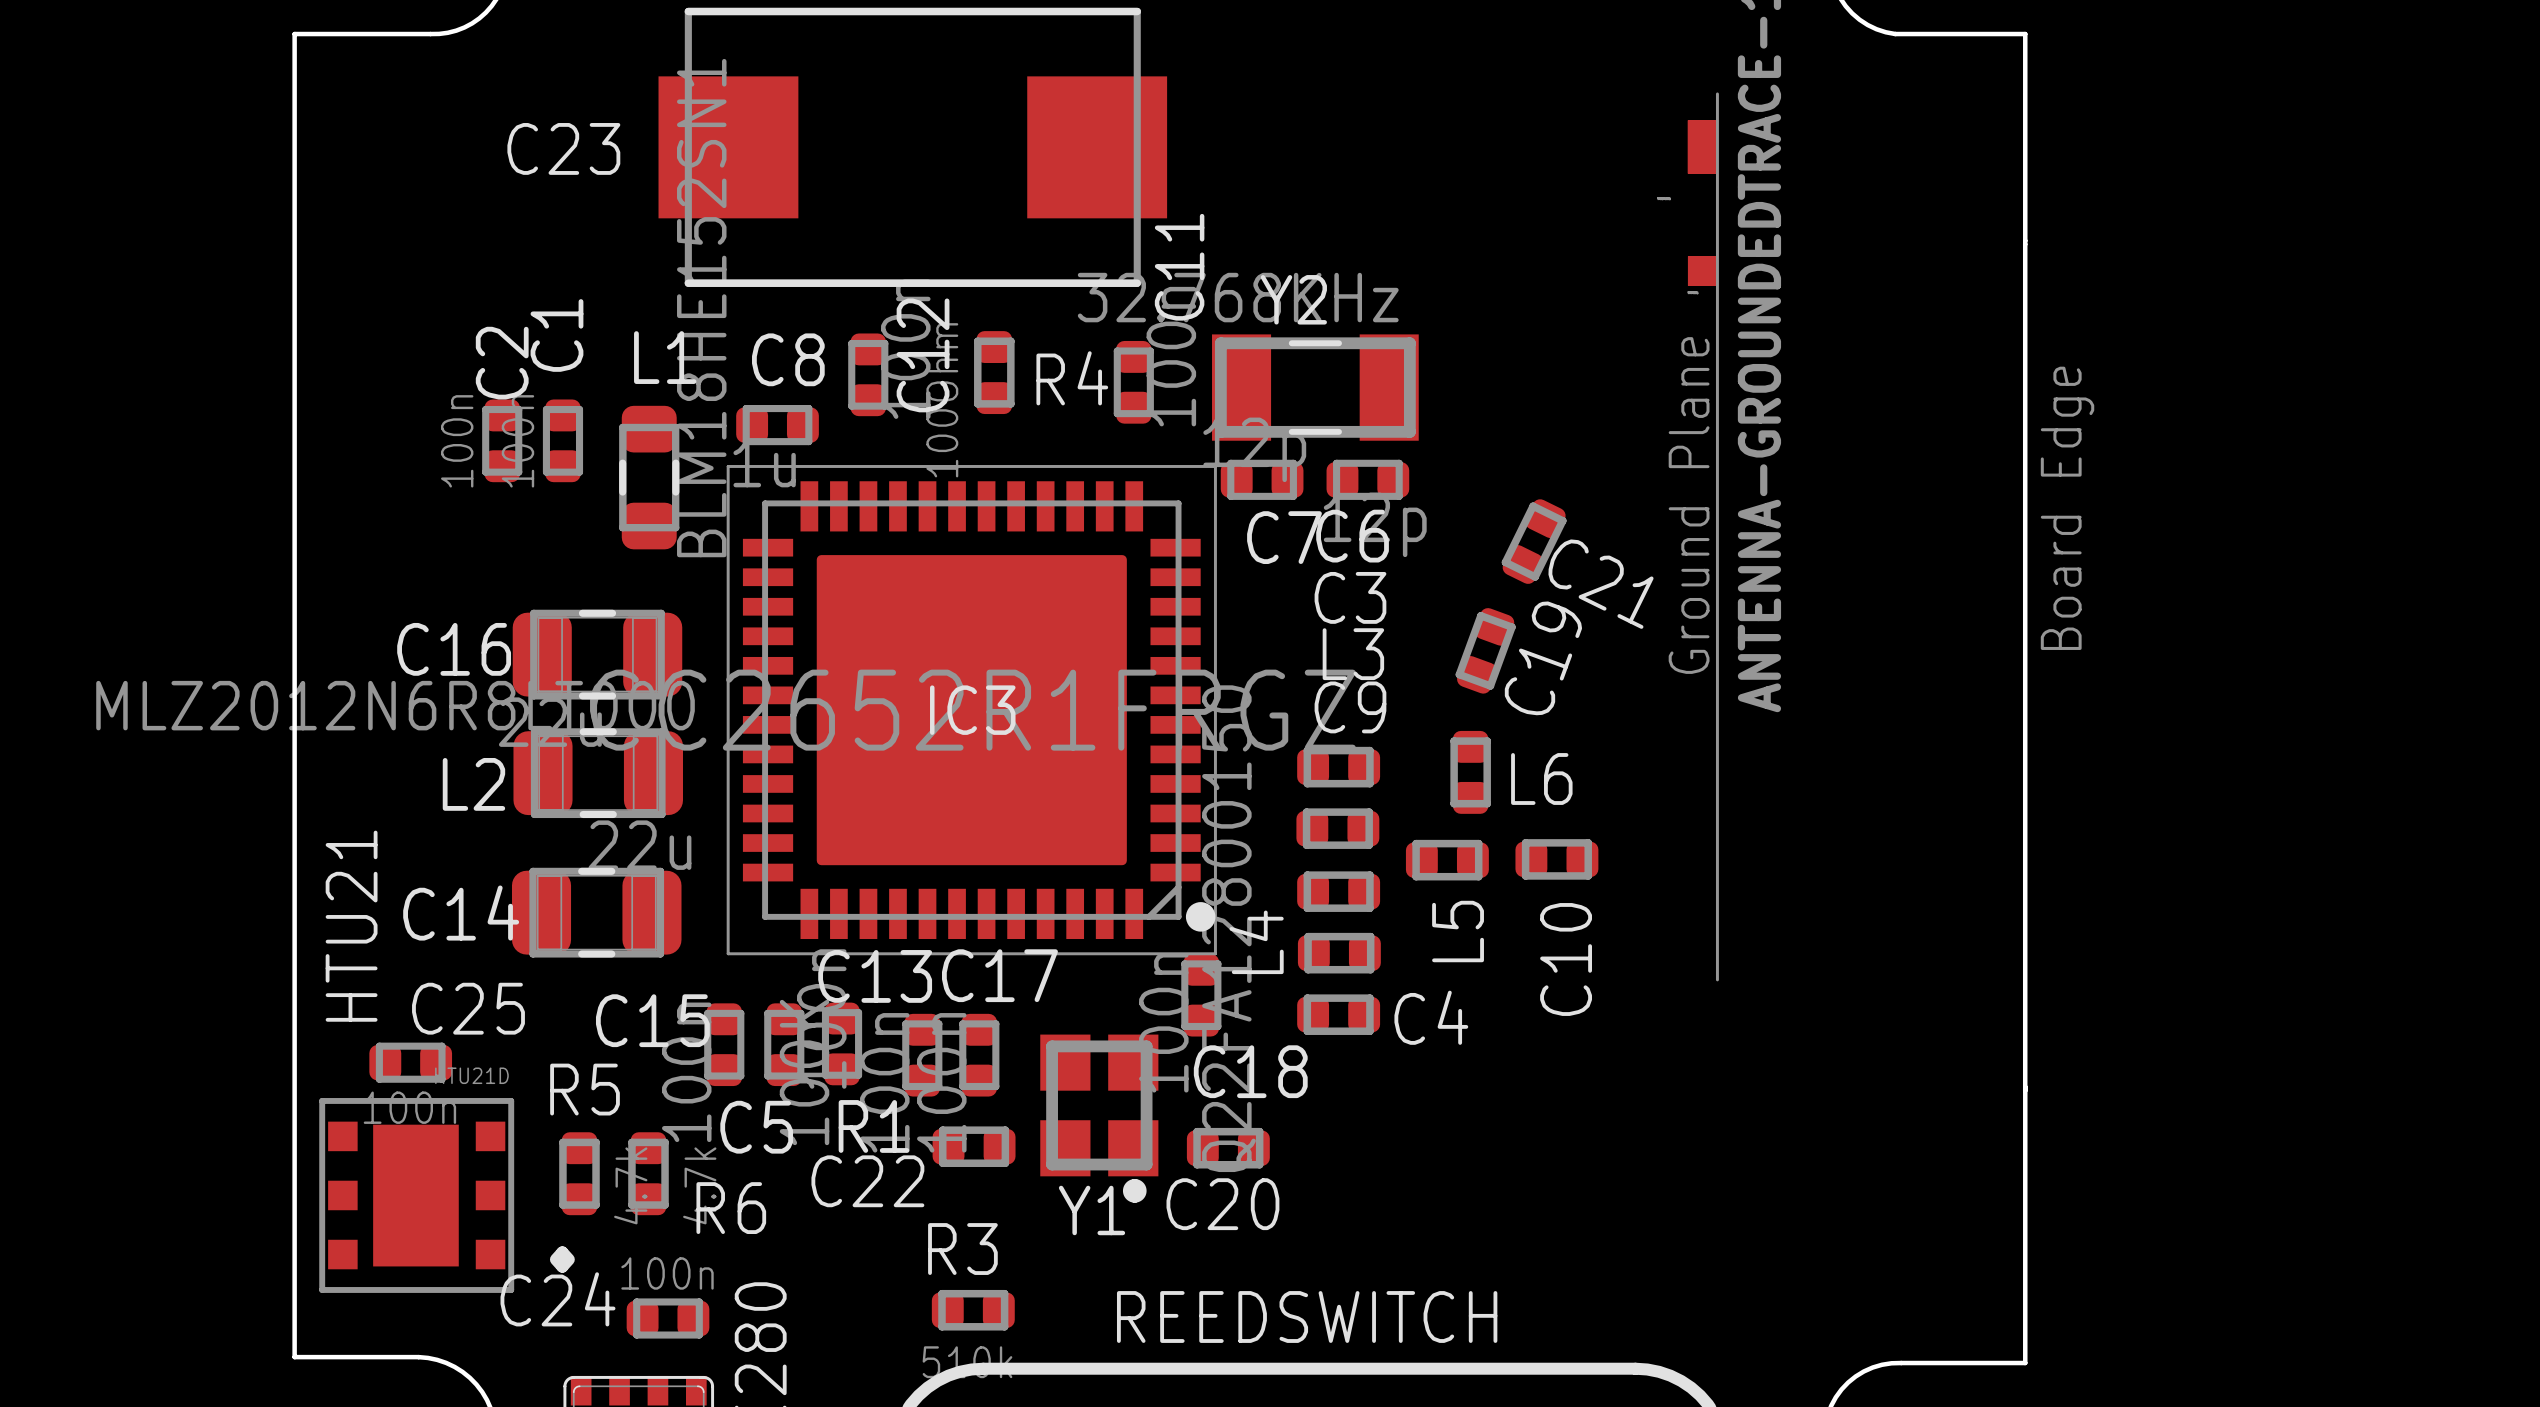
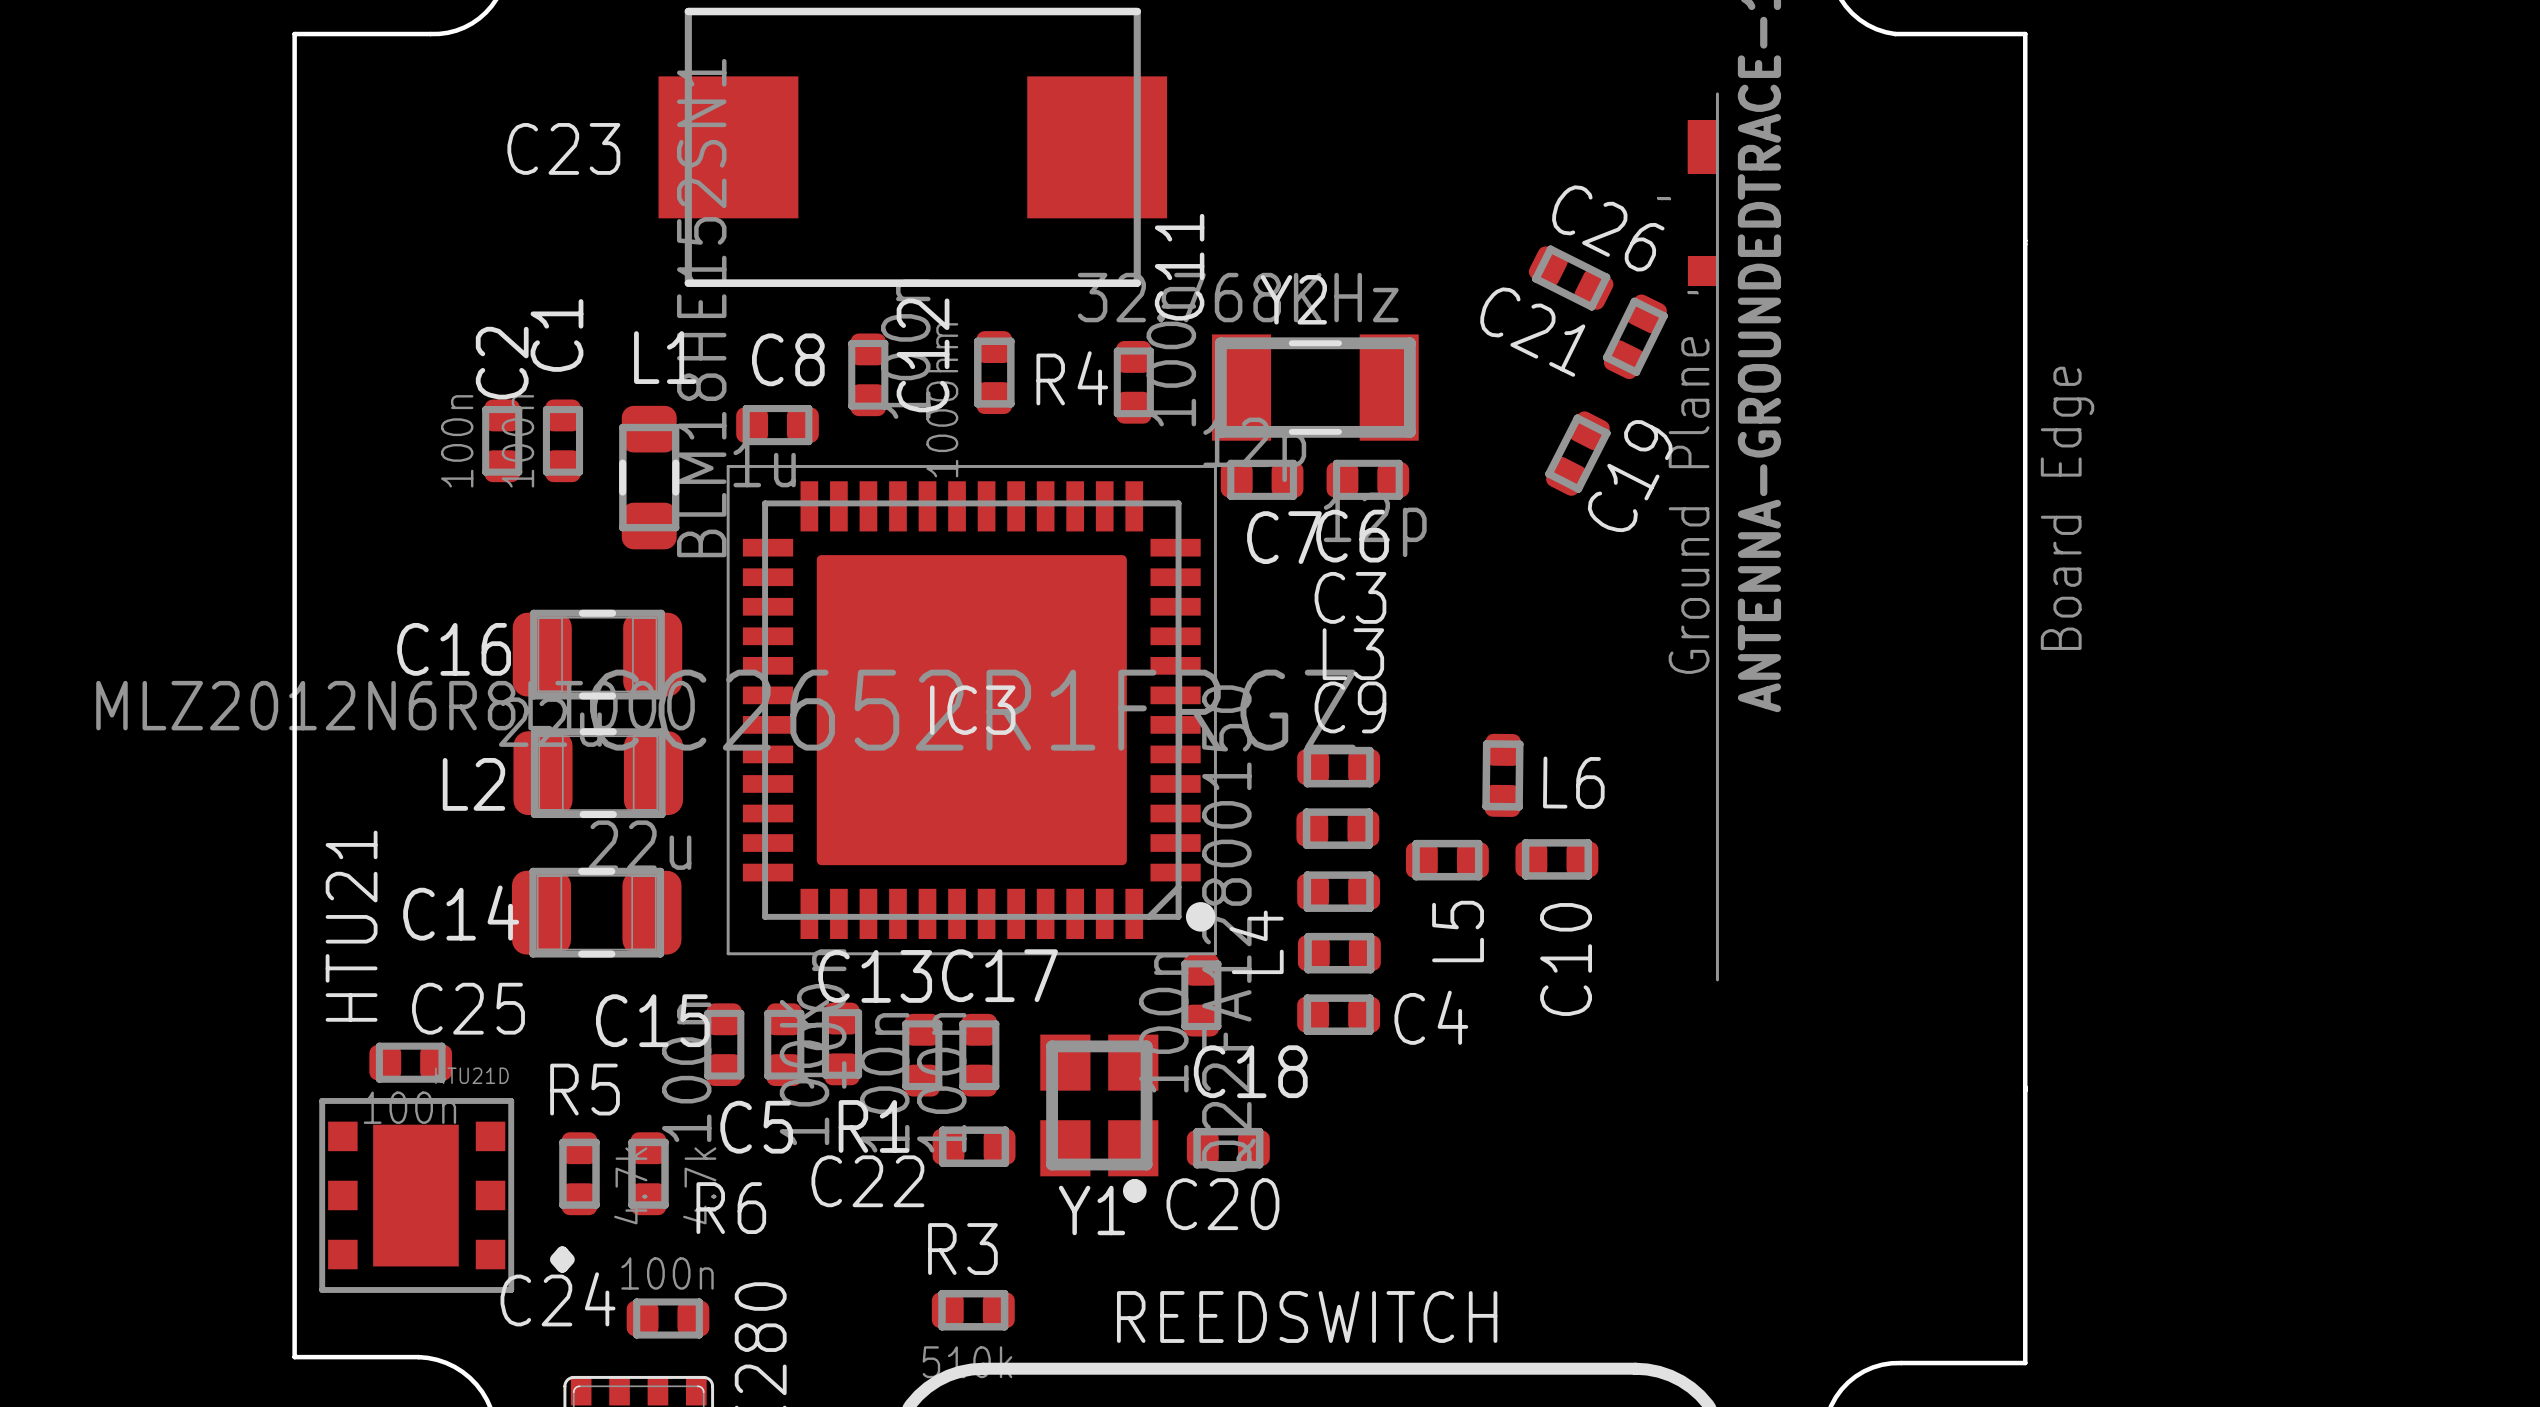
C26: none -> (1571, 278)
C21 position: (1534, 541) -> (1635, 336)
C21 name position: C21 (1601, 584) -> C21 (1532, 332)
C19 rotation: 0° (1485, 650) -> 6.9° clockwise (1577, 453)
C19 position: (1485, 650) -> (1577, 453)
L6 position: (1470, 772) -> (1502, 775)
L6 name rotation: 0° (1541, 778) -> 0.6° clockwise (1573, 782)

